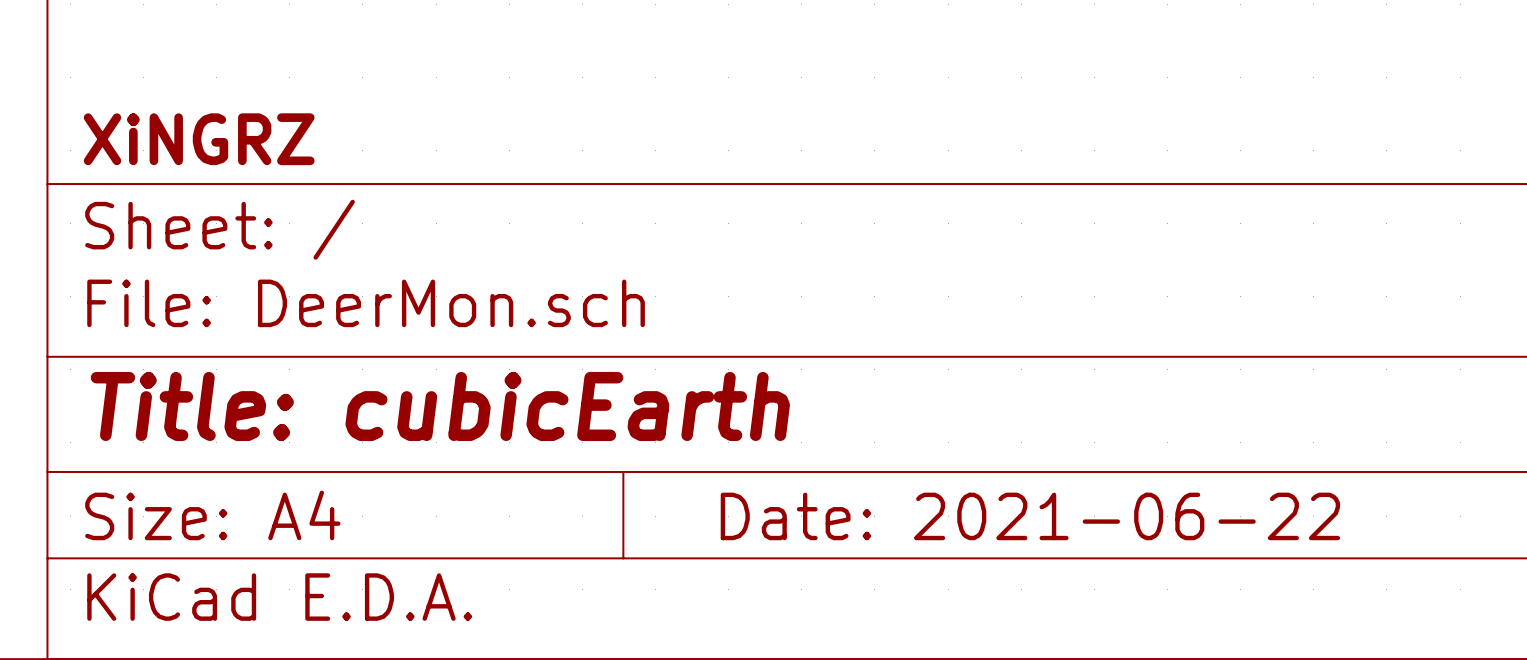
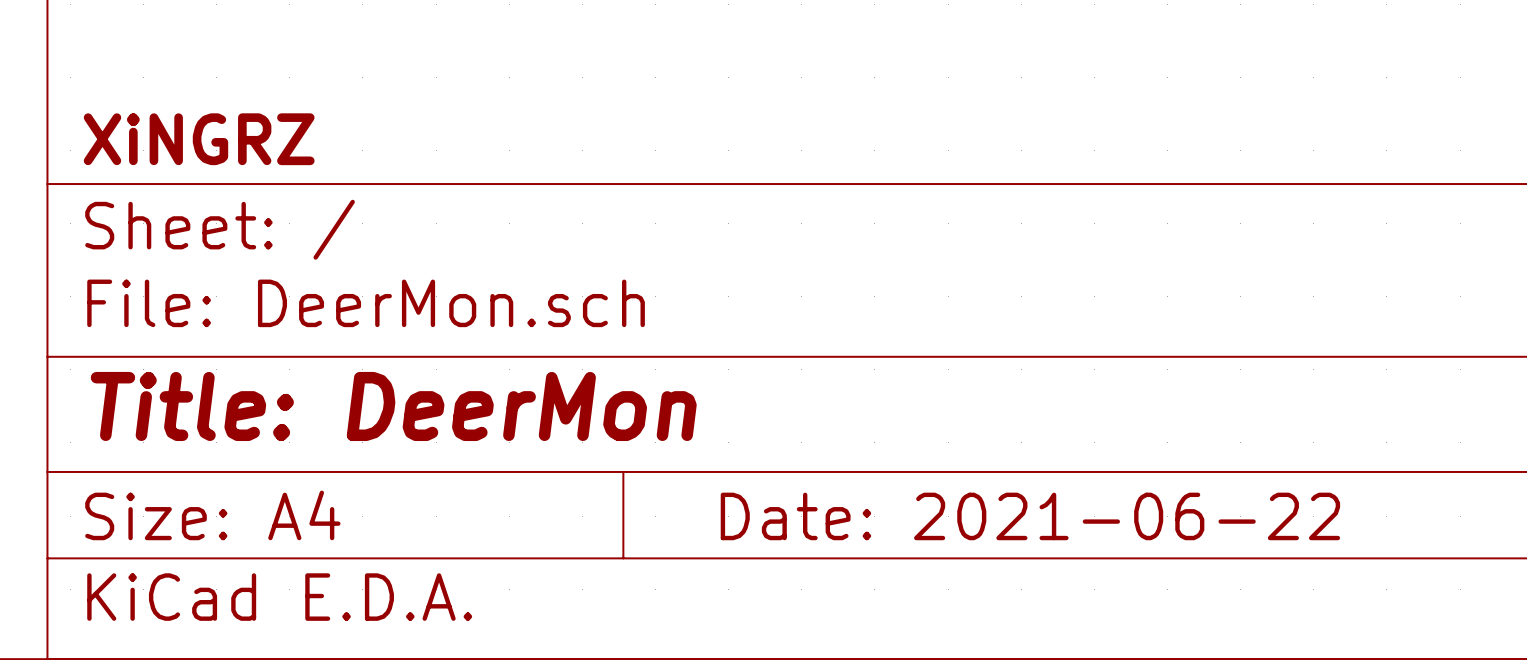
title block: Title: cubicEarth (440, 406) -> Title: DeerMon (393, 406)

